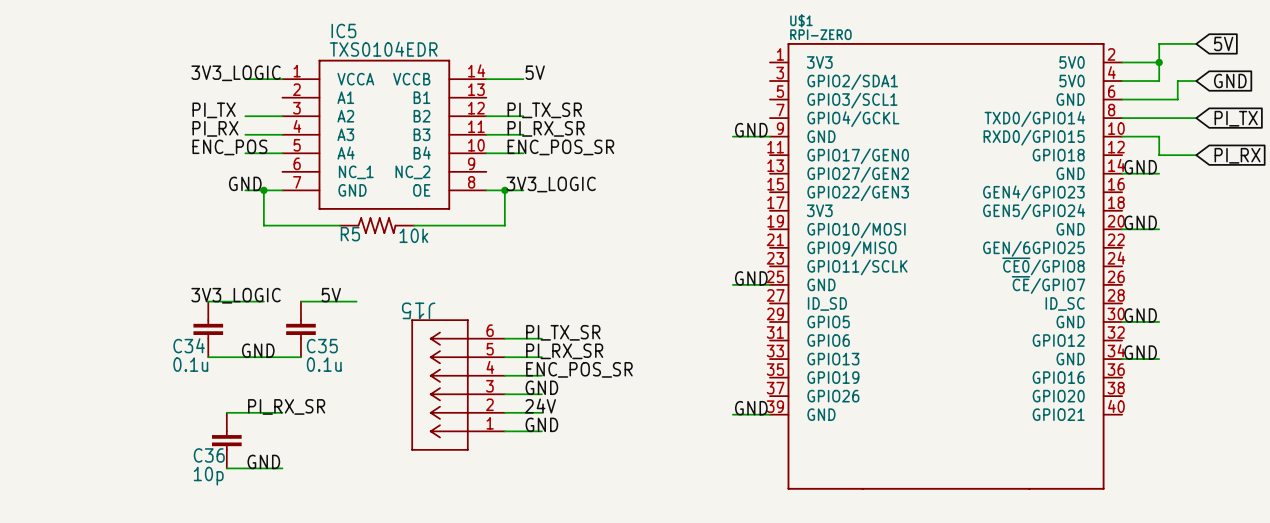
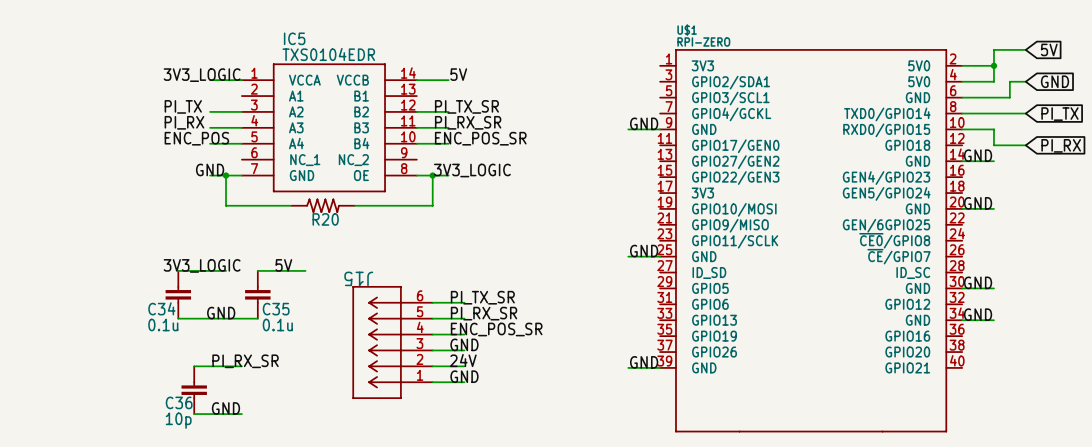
R5 name: R5 (350, 234) -> R20 (325, 219)
R5 value: 10k (413, 235) -> none

